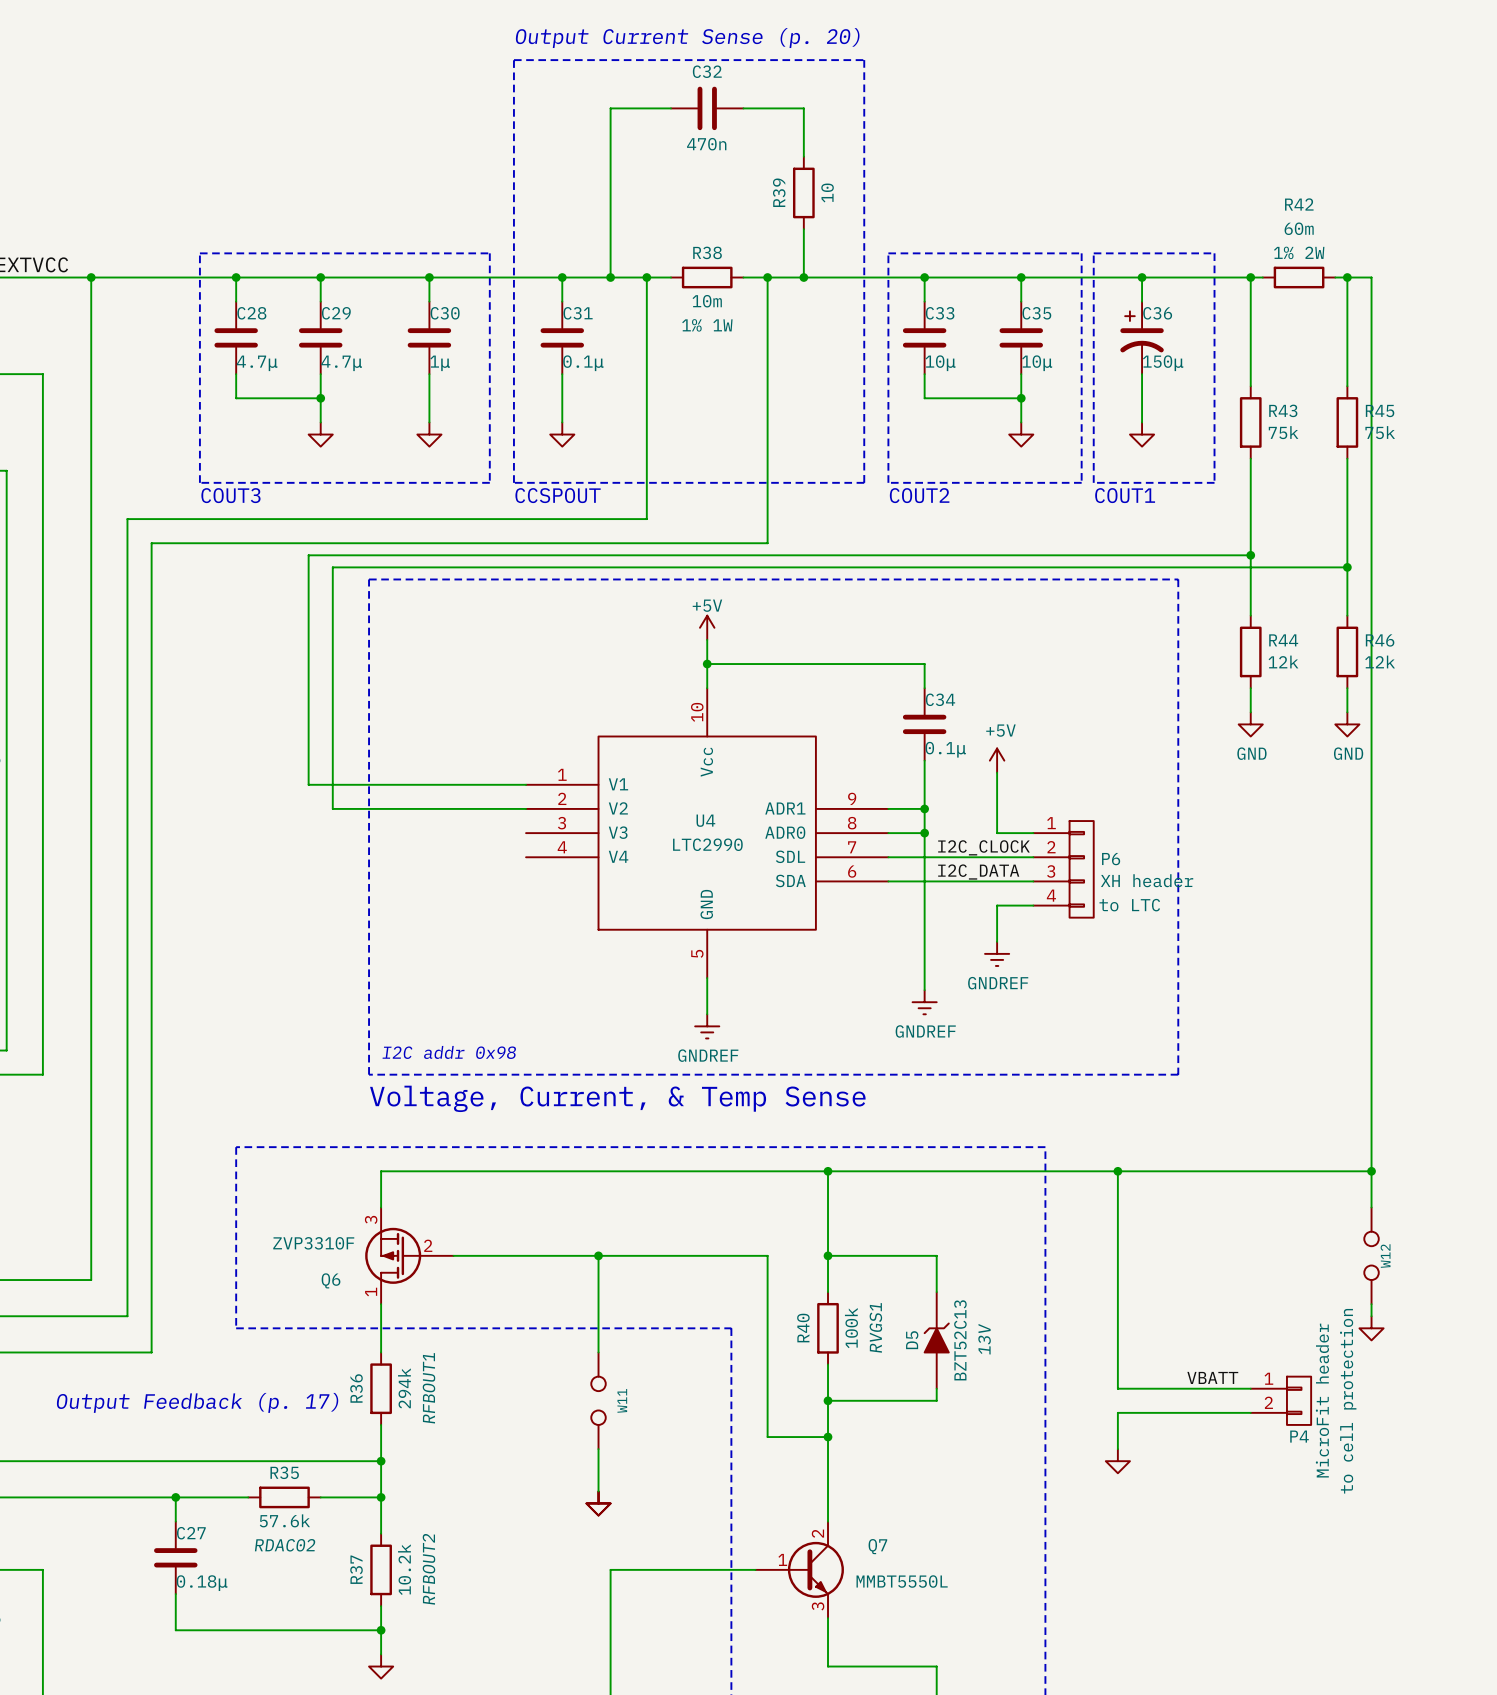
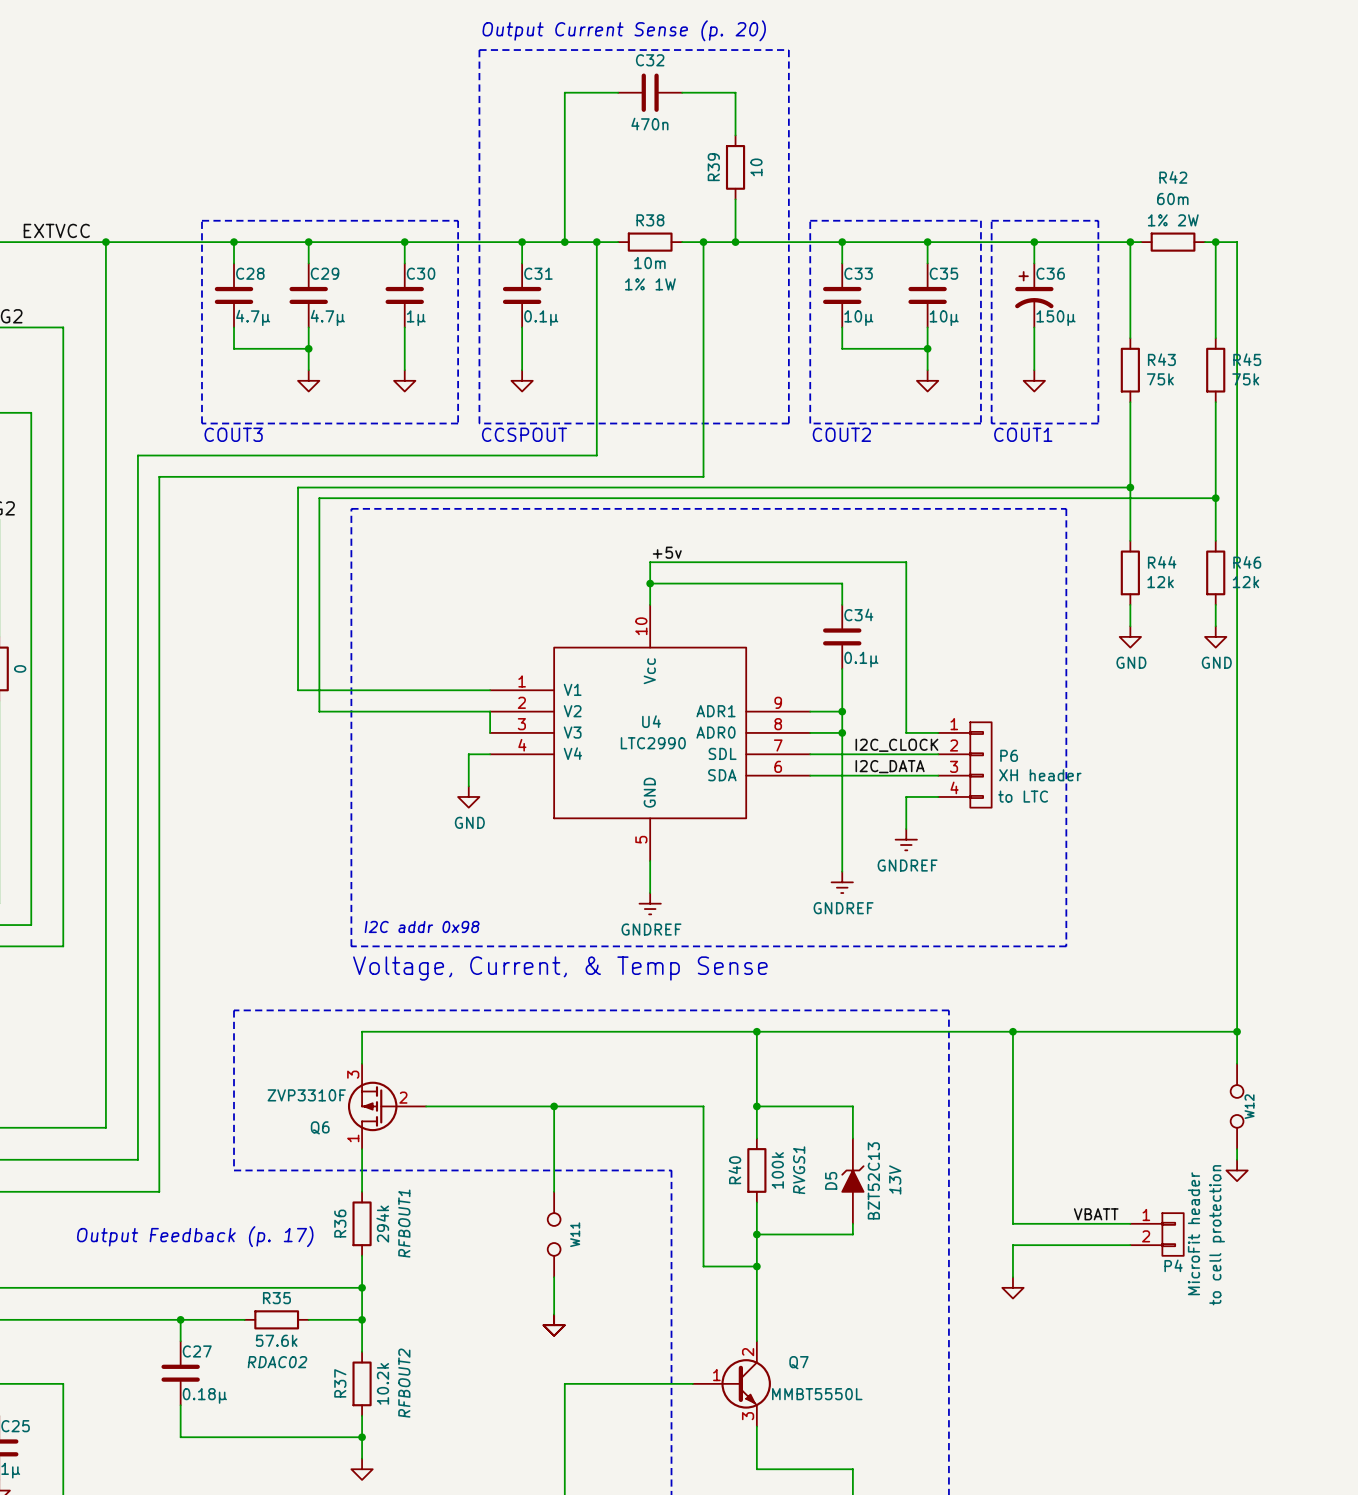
power symbol: +5V (707, 627) -> none
label: none -> +5v (667, 552)
wire: none -> (650, 562) (906, 562) (906, 679)
power symbol: +5V (997, 760) -> none
wire: none -> (490, 711) (490, 732)
wire: none -> (490, 754) (468, 754) (468, 786)
power symbol: none -> GND (468, 796)

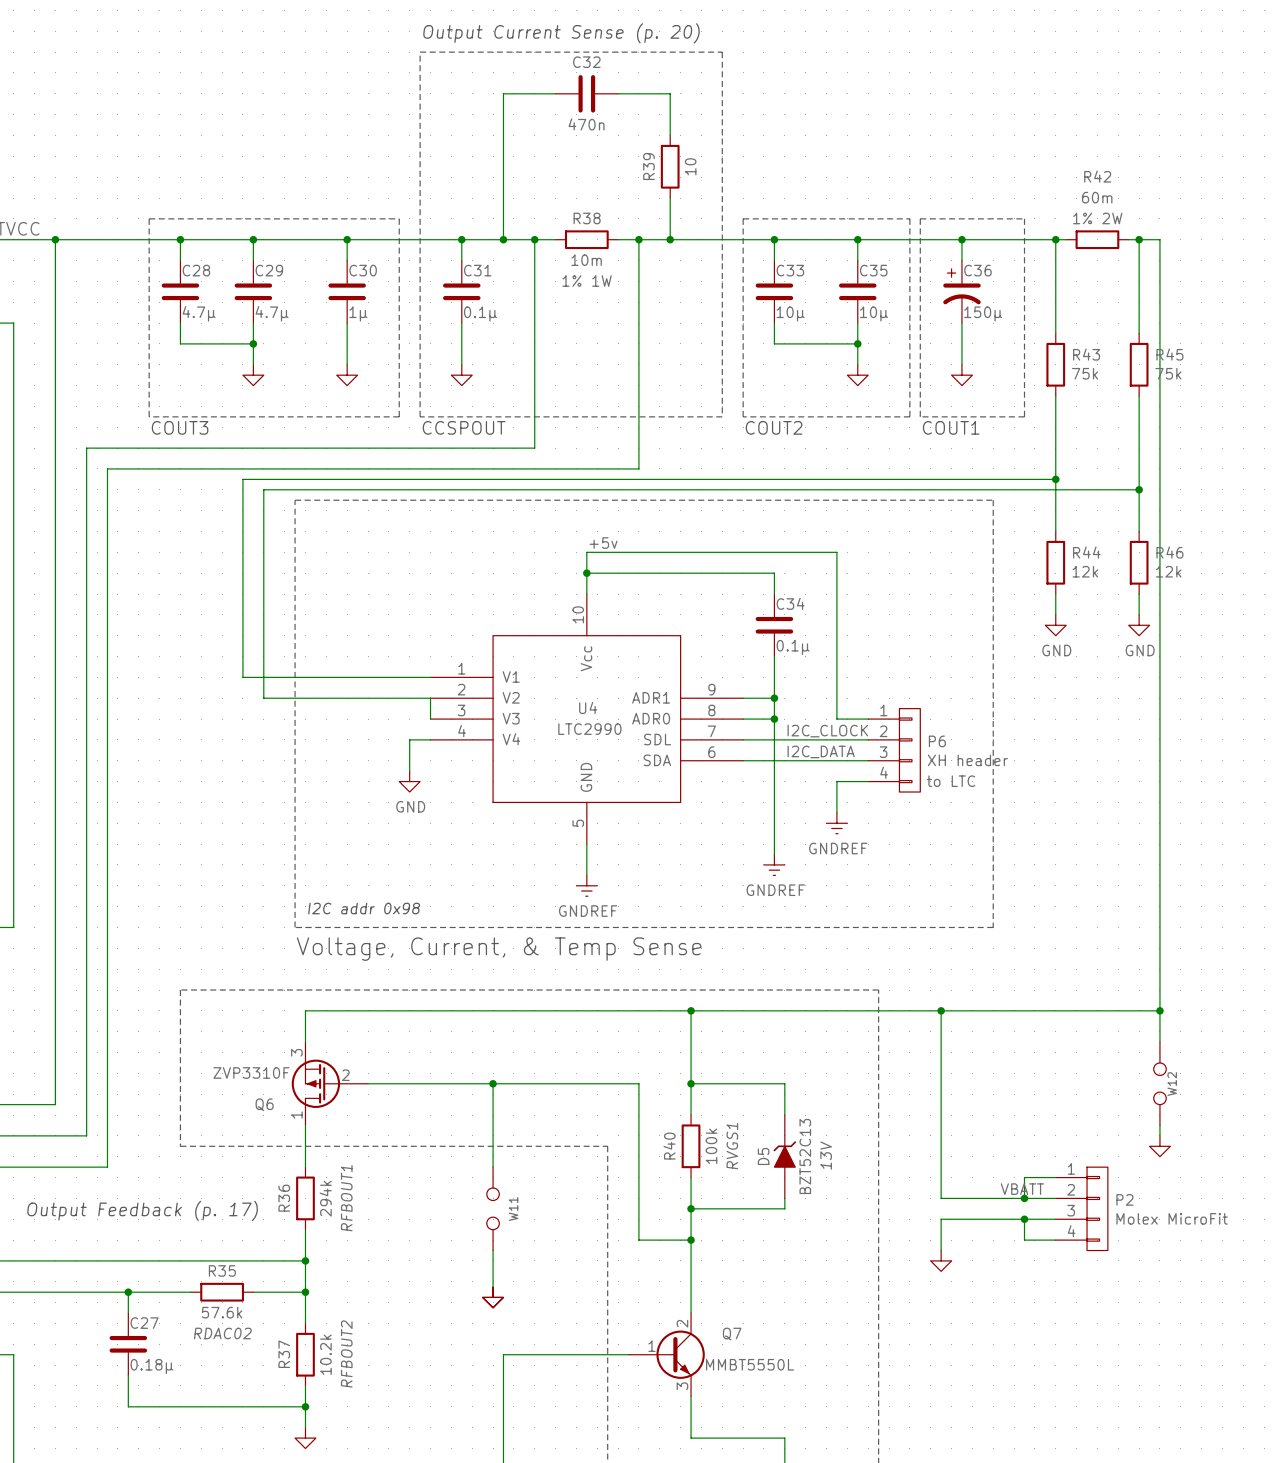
wire: none -> (1055, 1177) (1024, 1177) (1024, 1198)
junction: none -> (1024, 1198)
P4: MicroFit header (1157, 1234) -> none
P2: none -> Molex MicroFit (1081, 1208)
wire: none -> (1024, 1219) (1024, 1240) (1055, 1240)
junction: none -> (1024, 1219)

